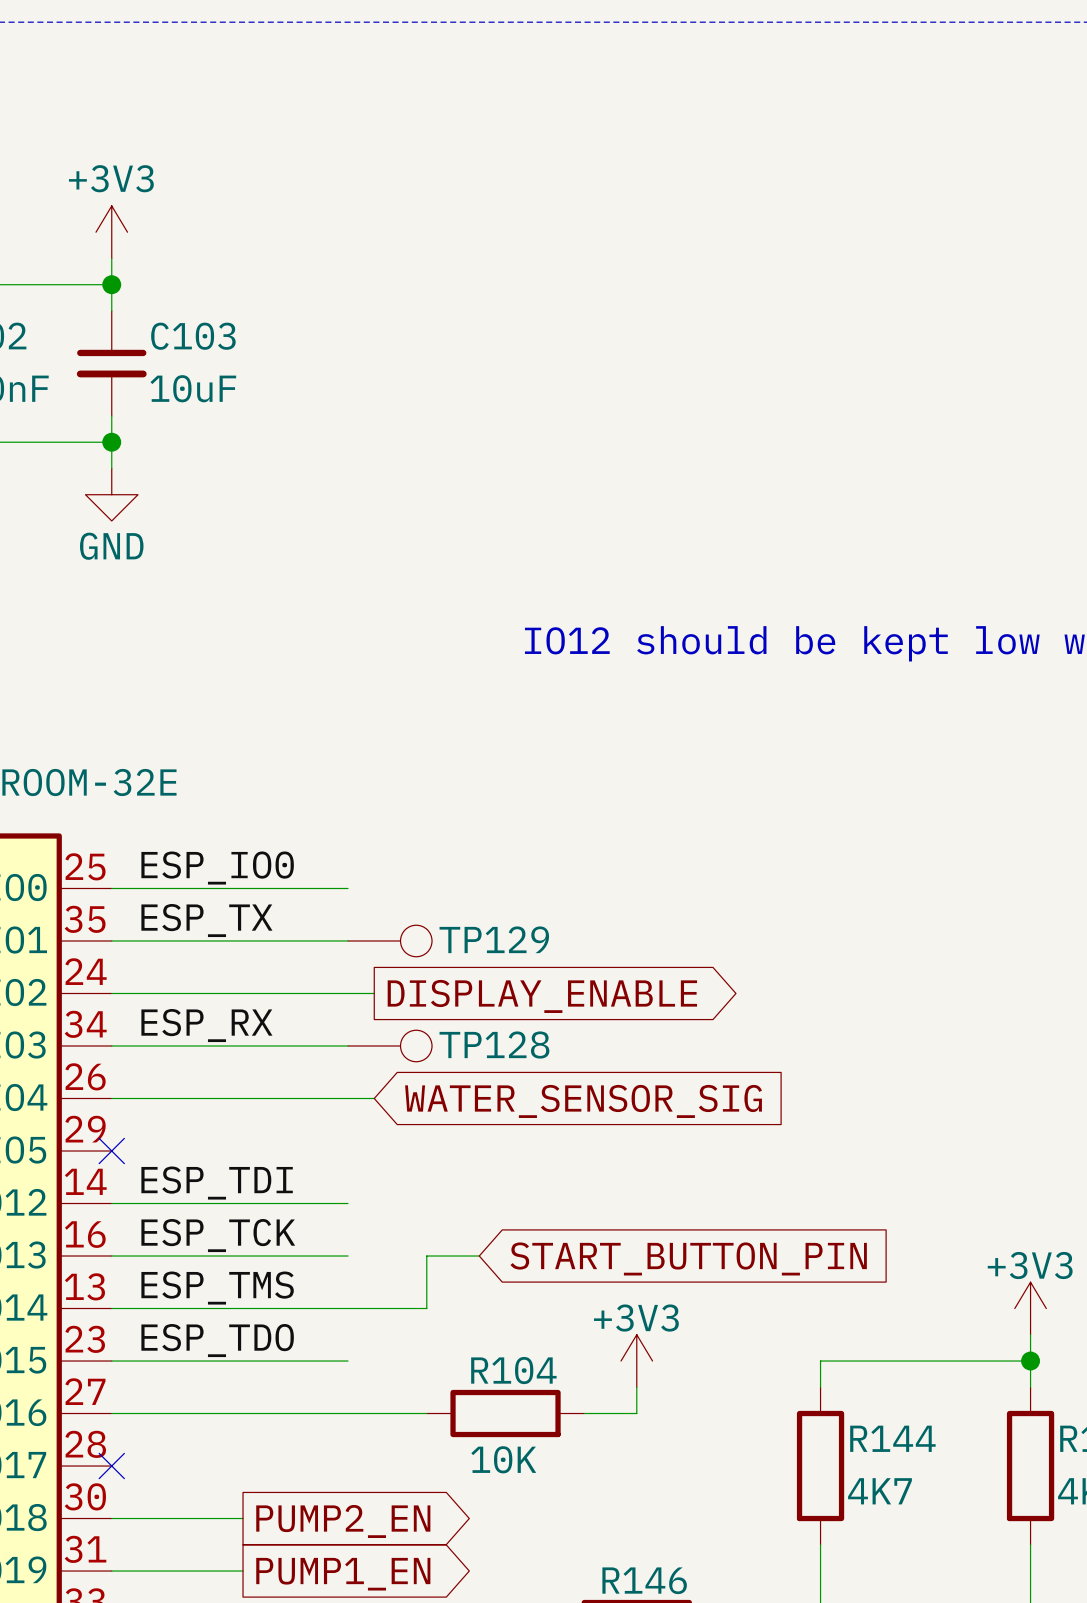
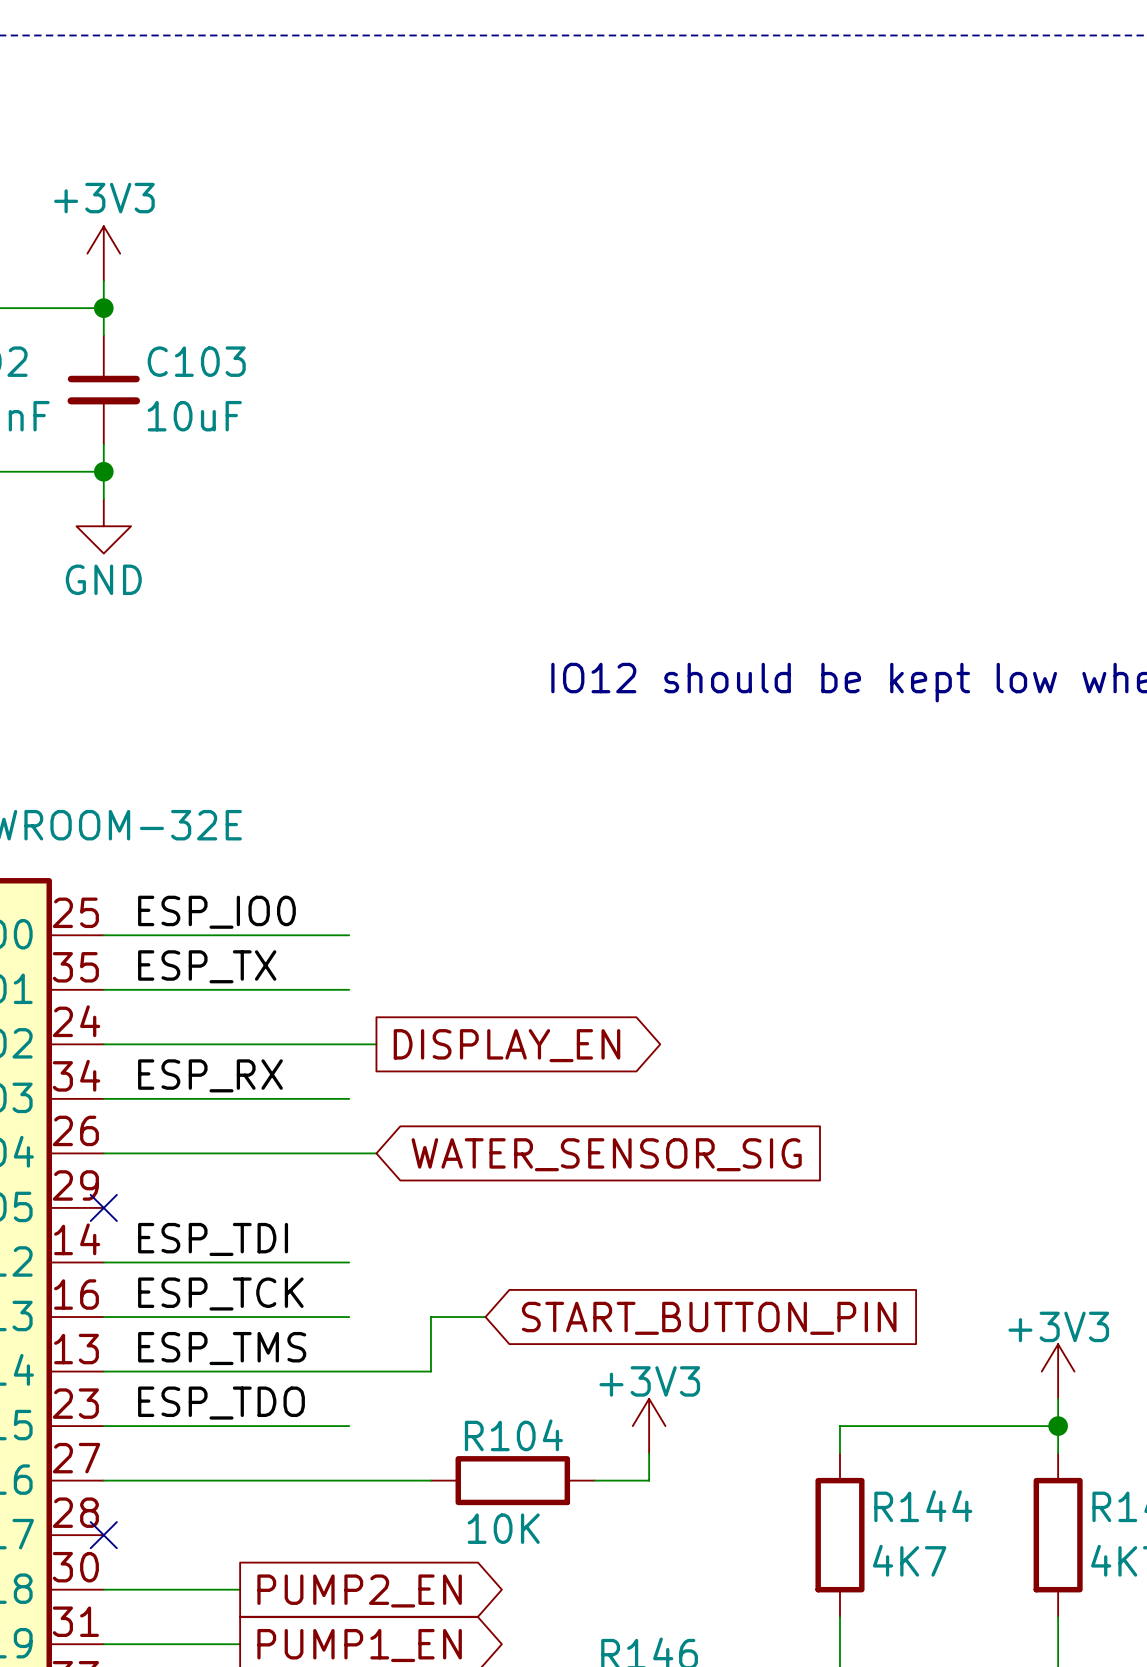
TP129: (390, 940) -> none
global label: DISPLAY_ENABLE (542, 996) -> DISPLAY_EN (506, 1045)
TP128: (390, 1045) -> none

